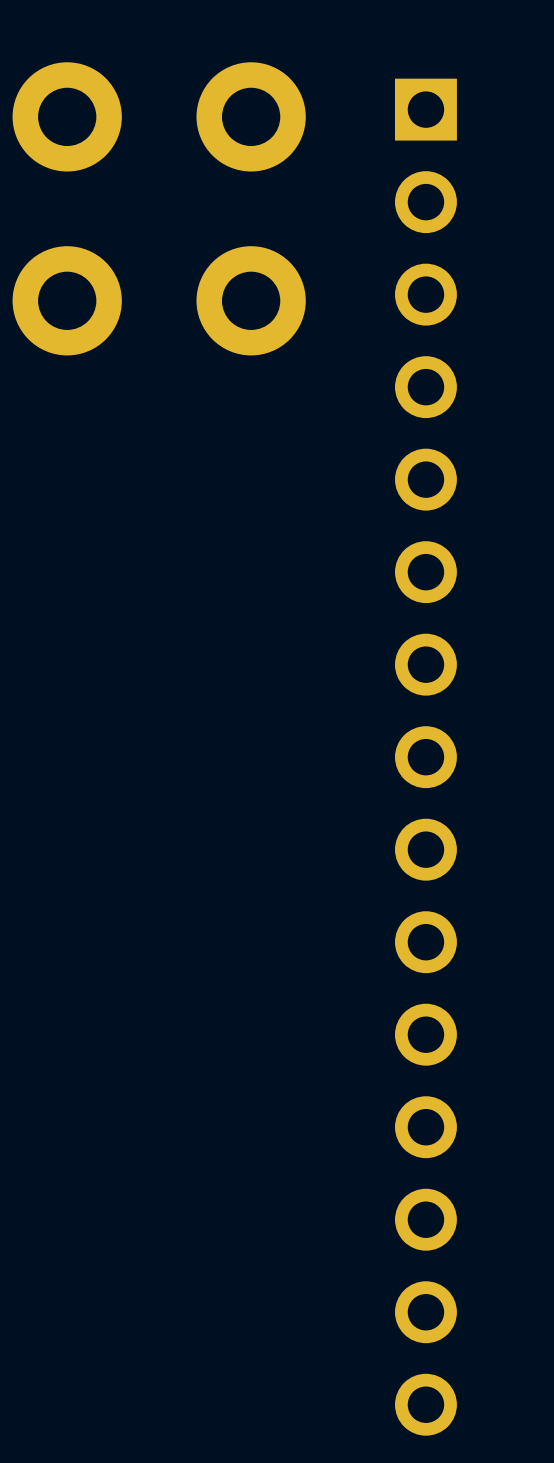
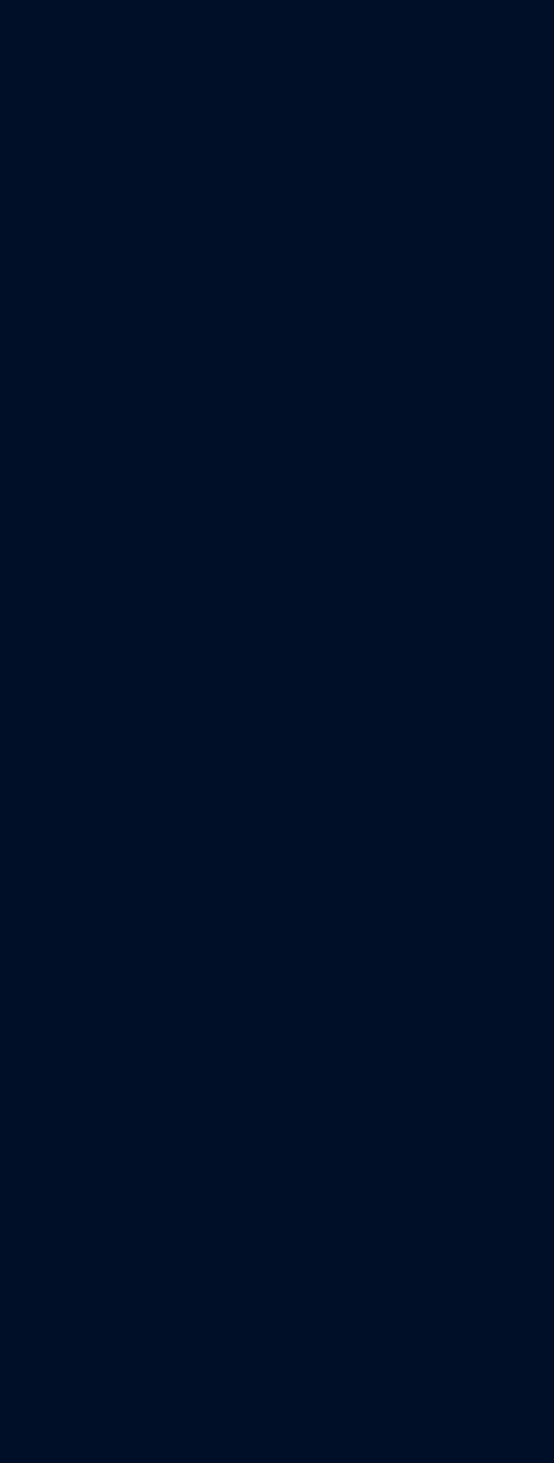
part: (67, 116) -> none
part: (251, 116) -> none
part: (67, 300) -> none
part: (251, 300) -> none
part: (425, 757) -> none

